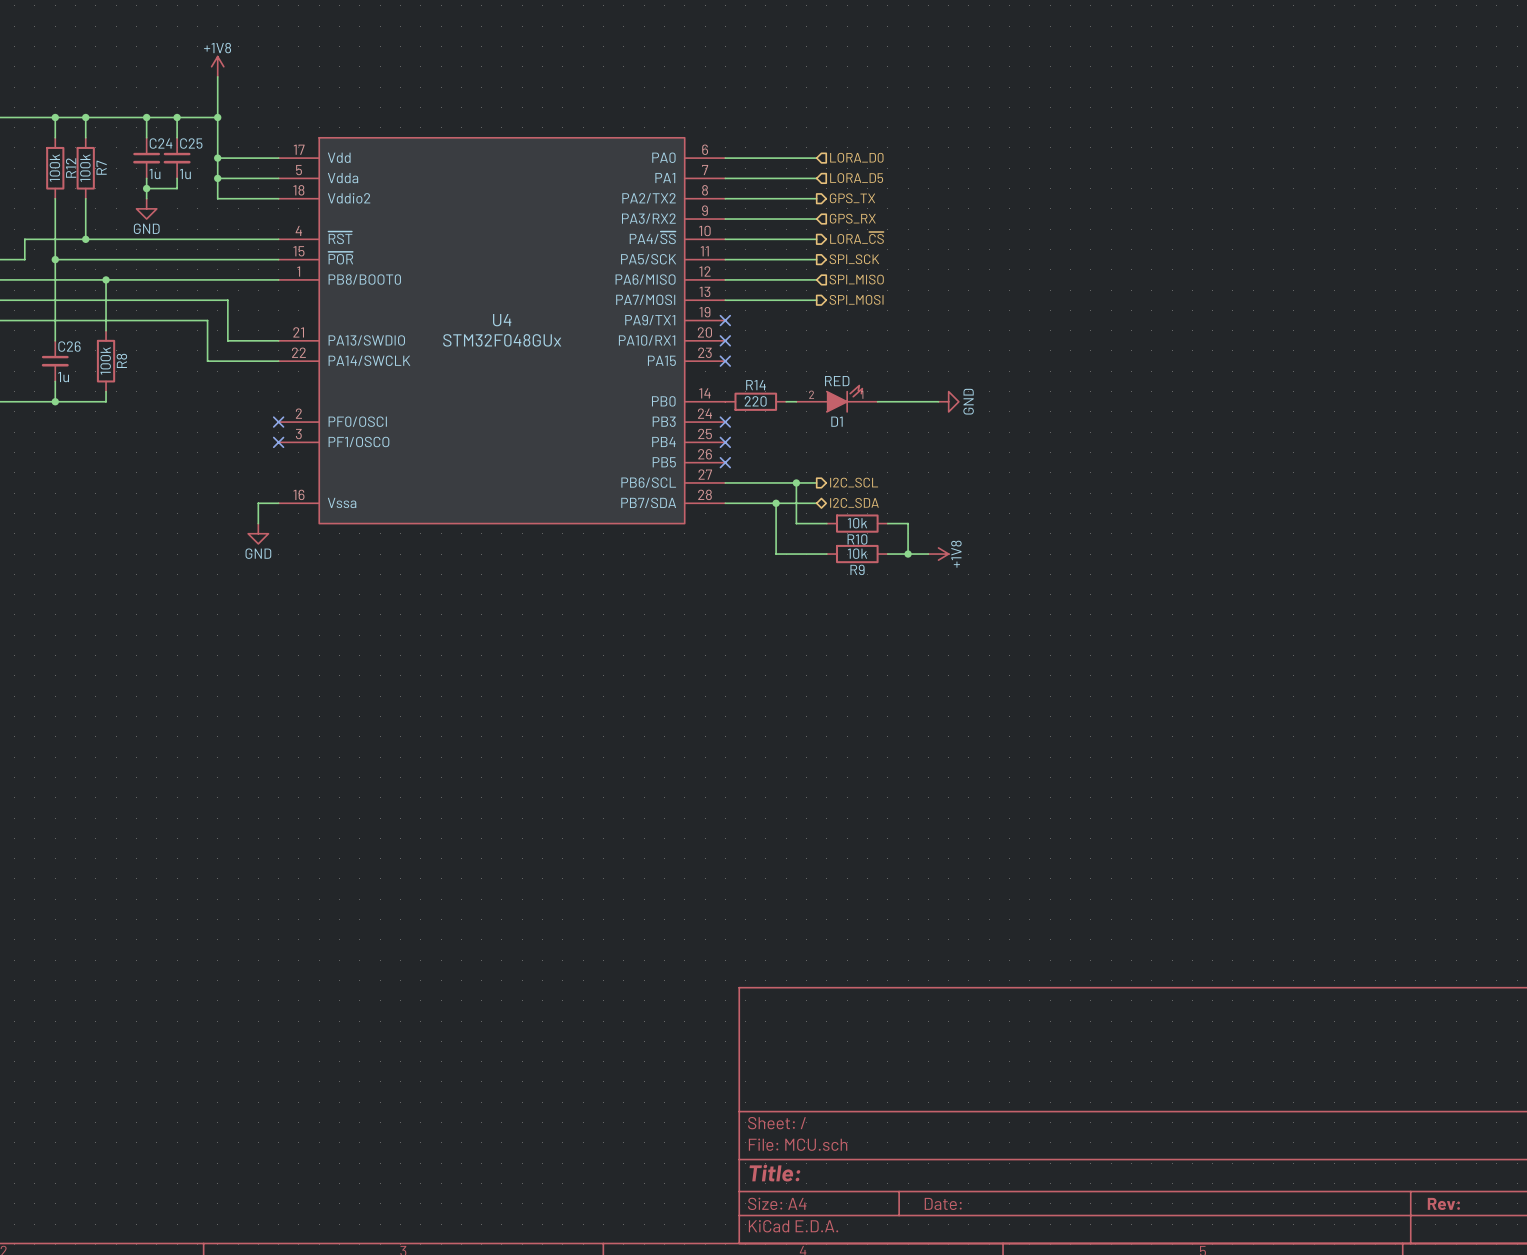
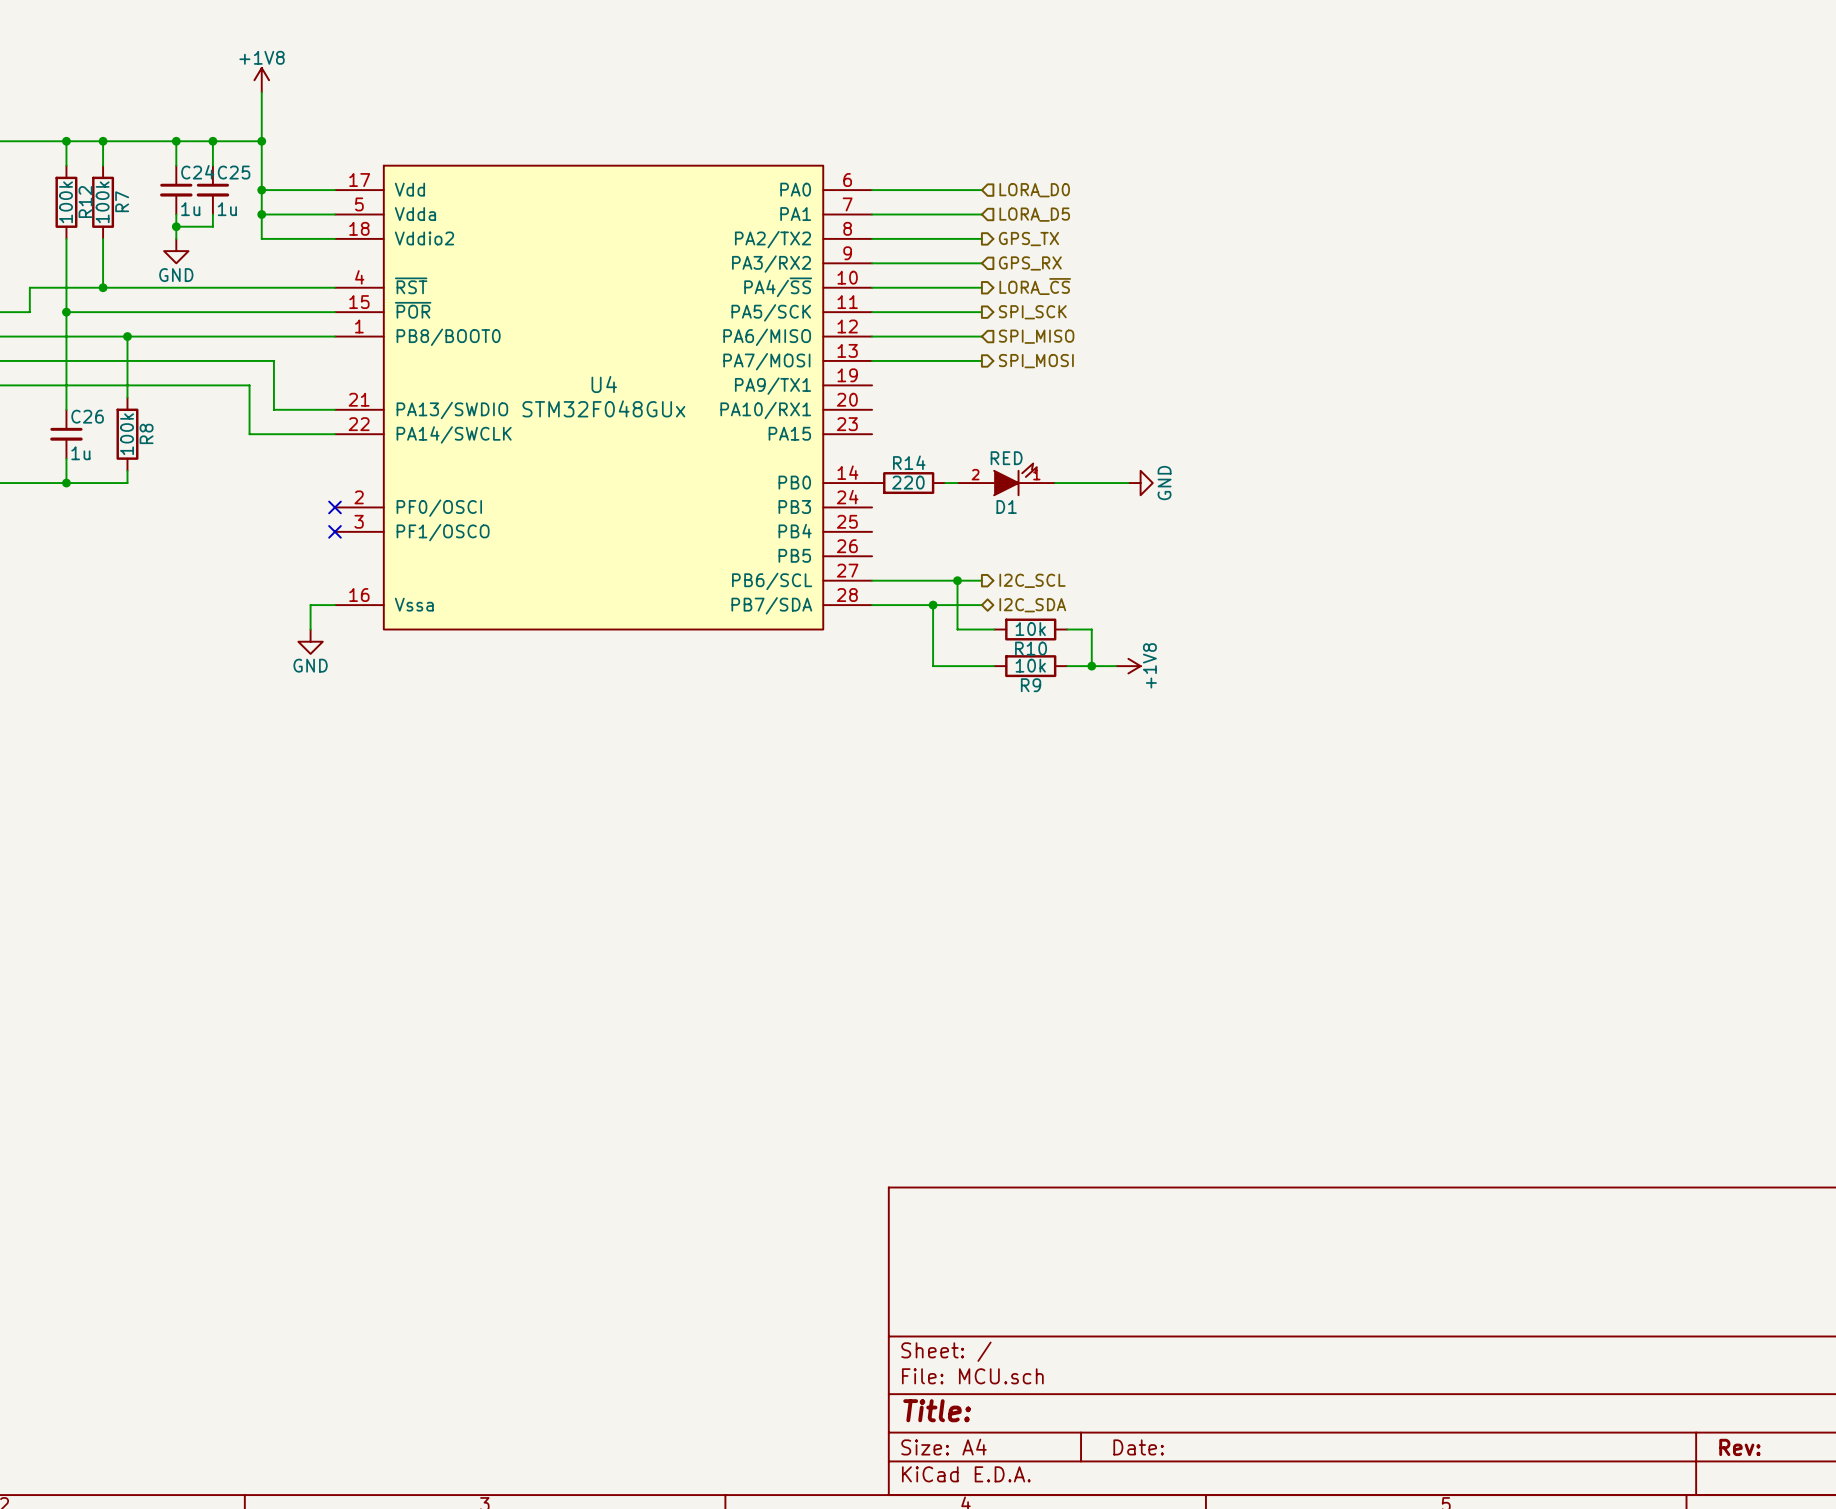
no-connect mark: (725, 320) -> none
no-connect mark: (725, 340) -> none
no-connect mark: (725, 361) -> none
no-connect mark: (725, 422) -> none
no-connect mark: (725, 442) -> none
no-connect mark: (725, 462) -> none

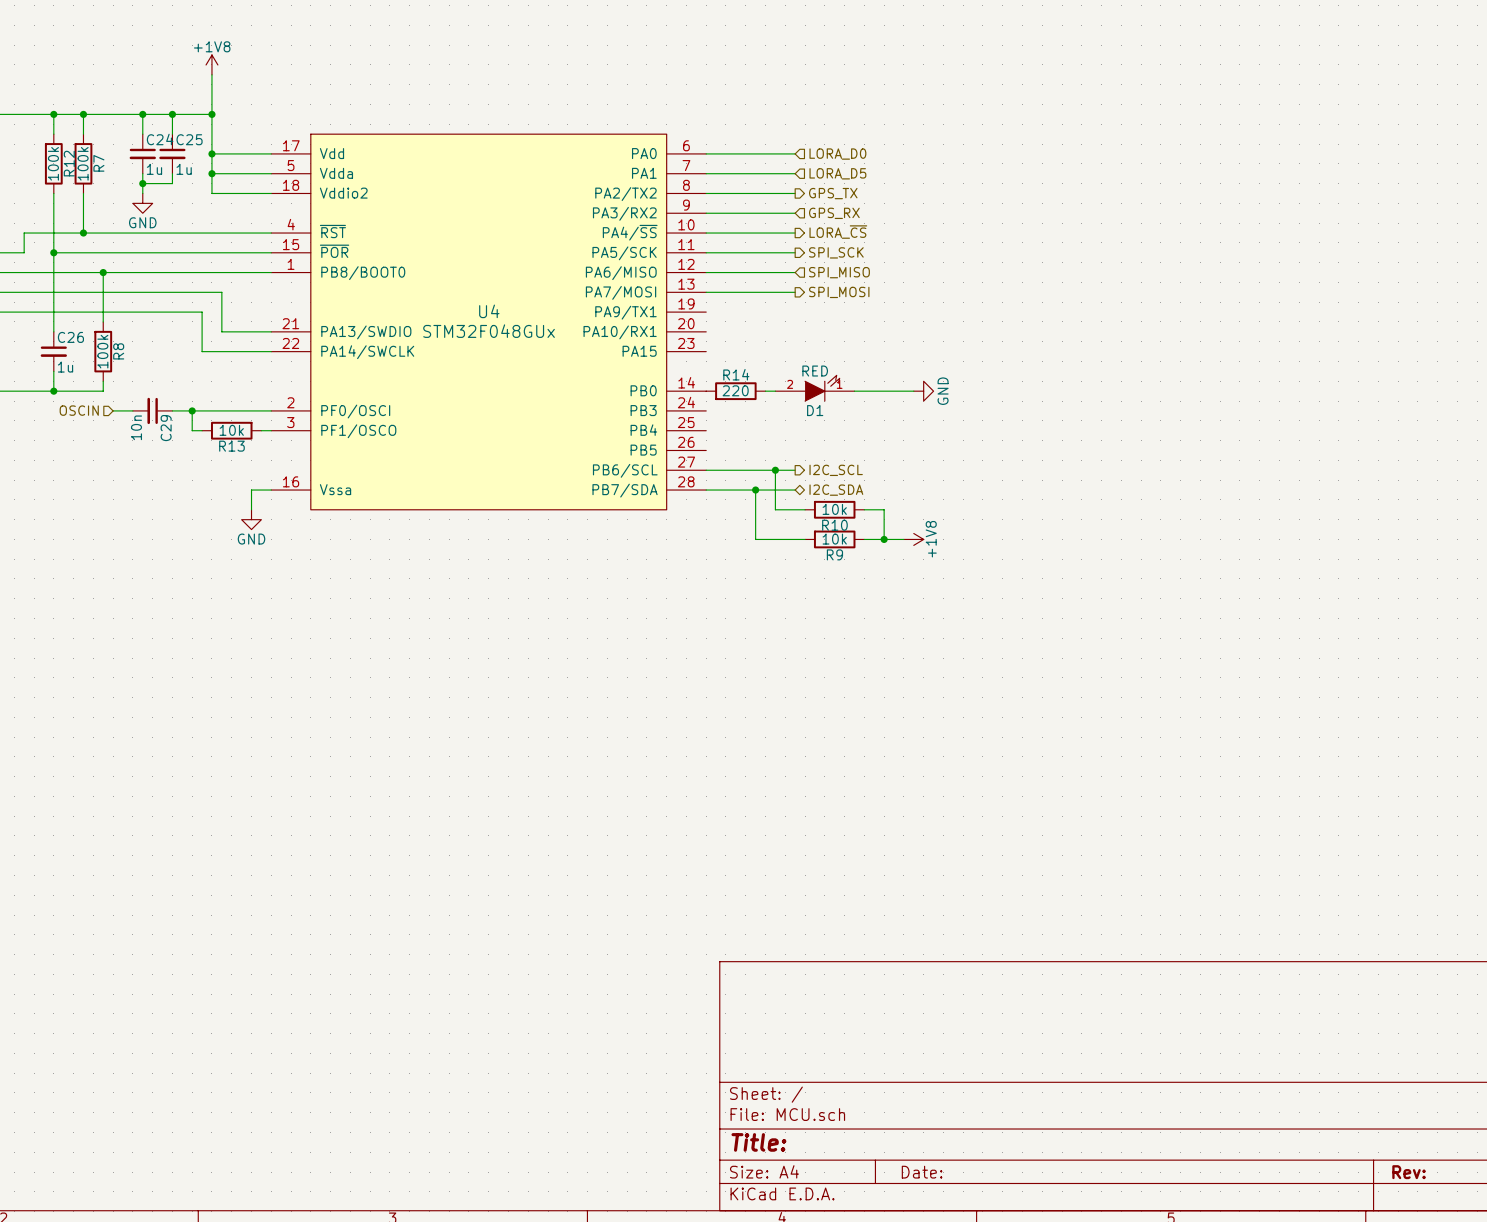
hierarchical label: none -> OSCIN (79, 410)
wire: none -> (113, 410) (132, 410)
C29: none -> 10n (152, 410)
wire: none -> (172, 410) (271, 410)
wire: none -> (192, 410) (192, 430) (202, 430)
junction: none -> (192, 410)
no-connect mark: (334, 507) -> none
R13: none -> 10k (231, 430)
wire: none -> (261, 430) (271, 430)
no-connect mark: (334, 531) -> none

